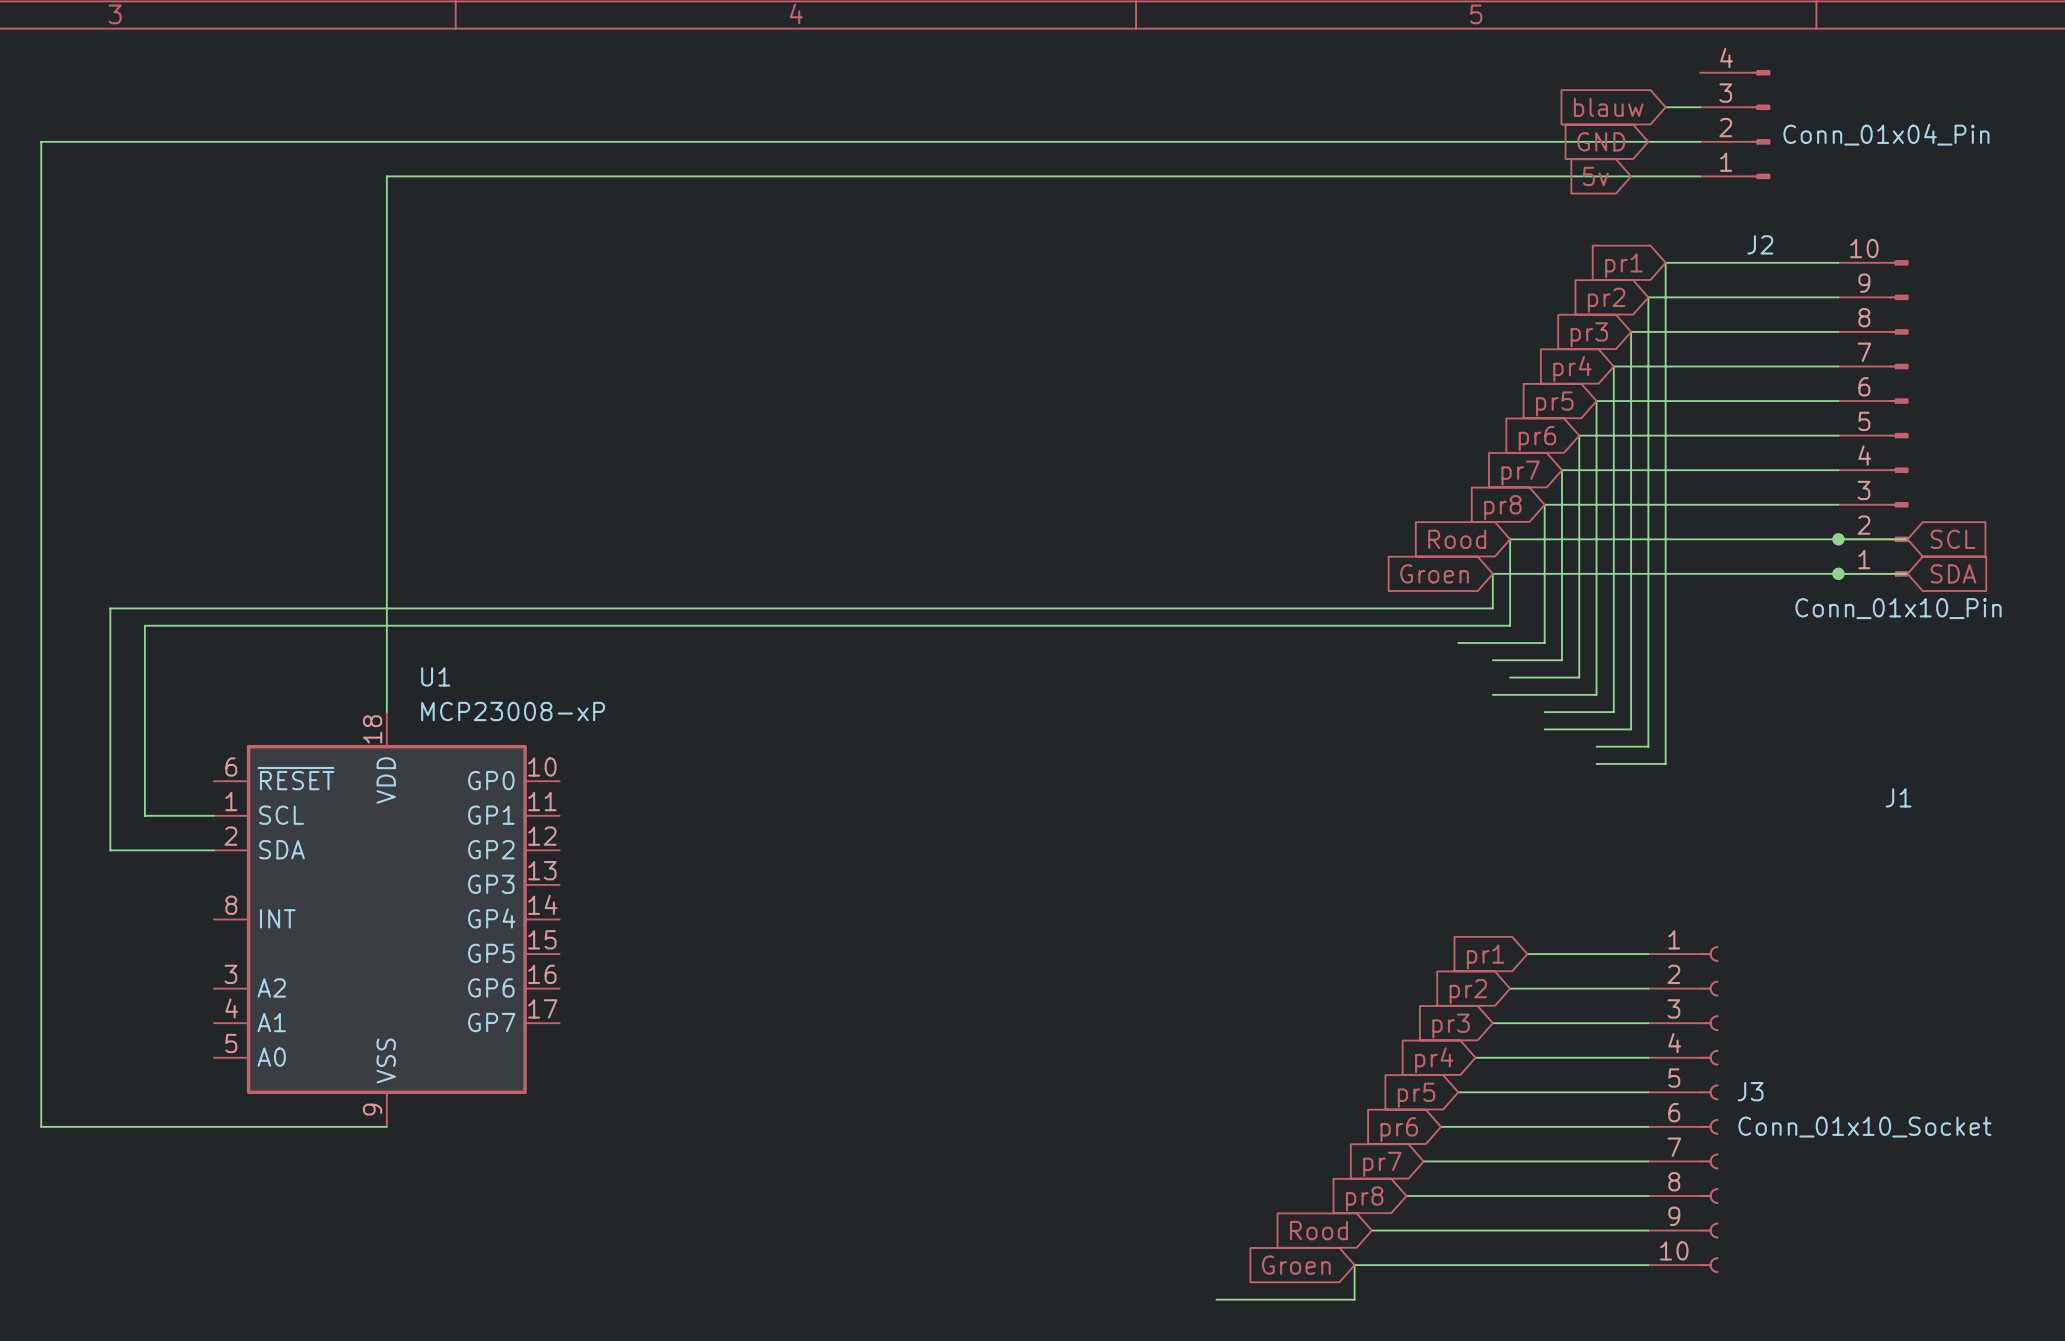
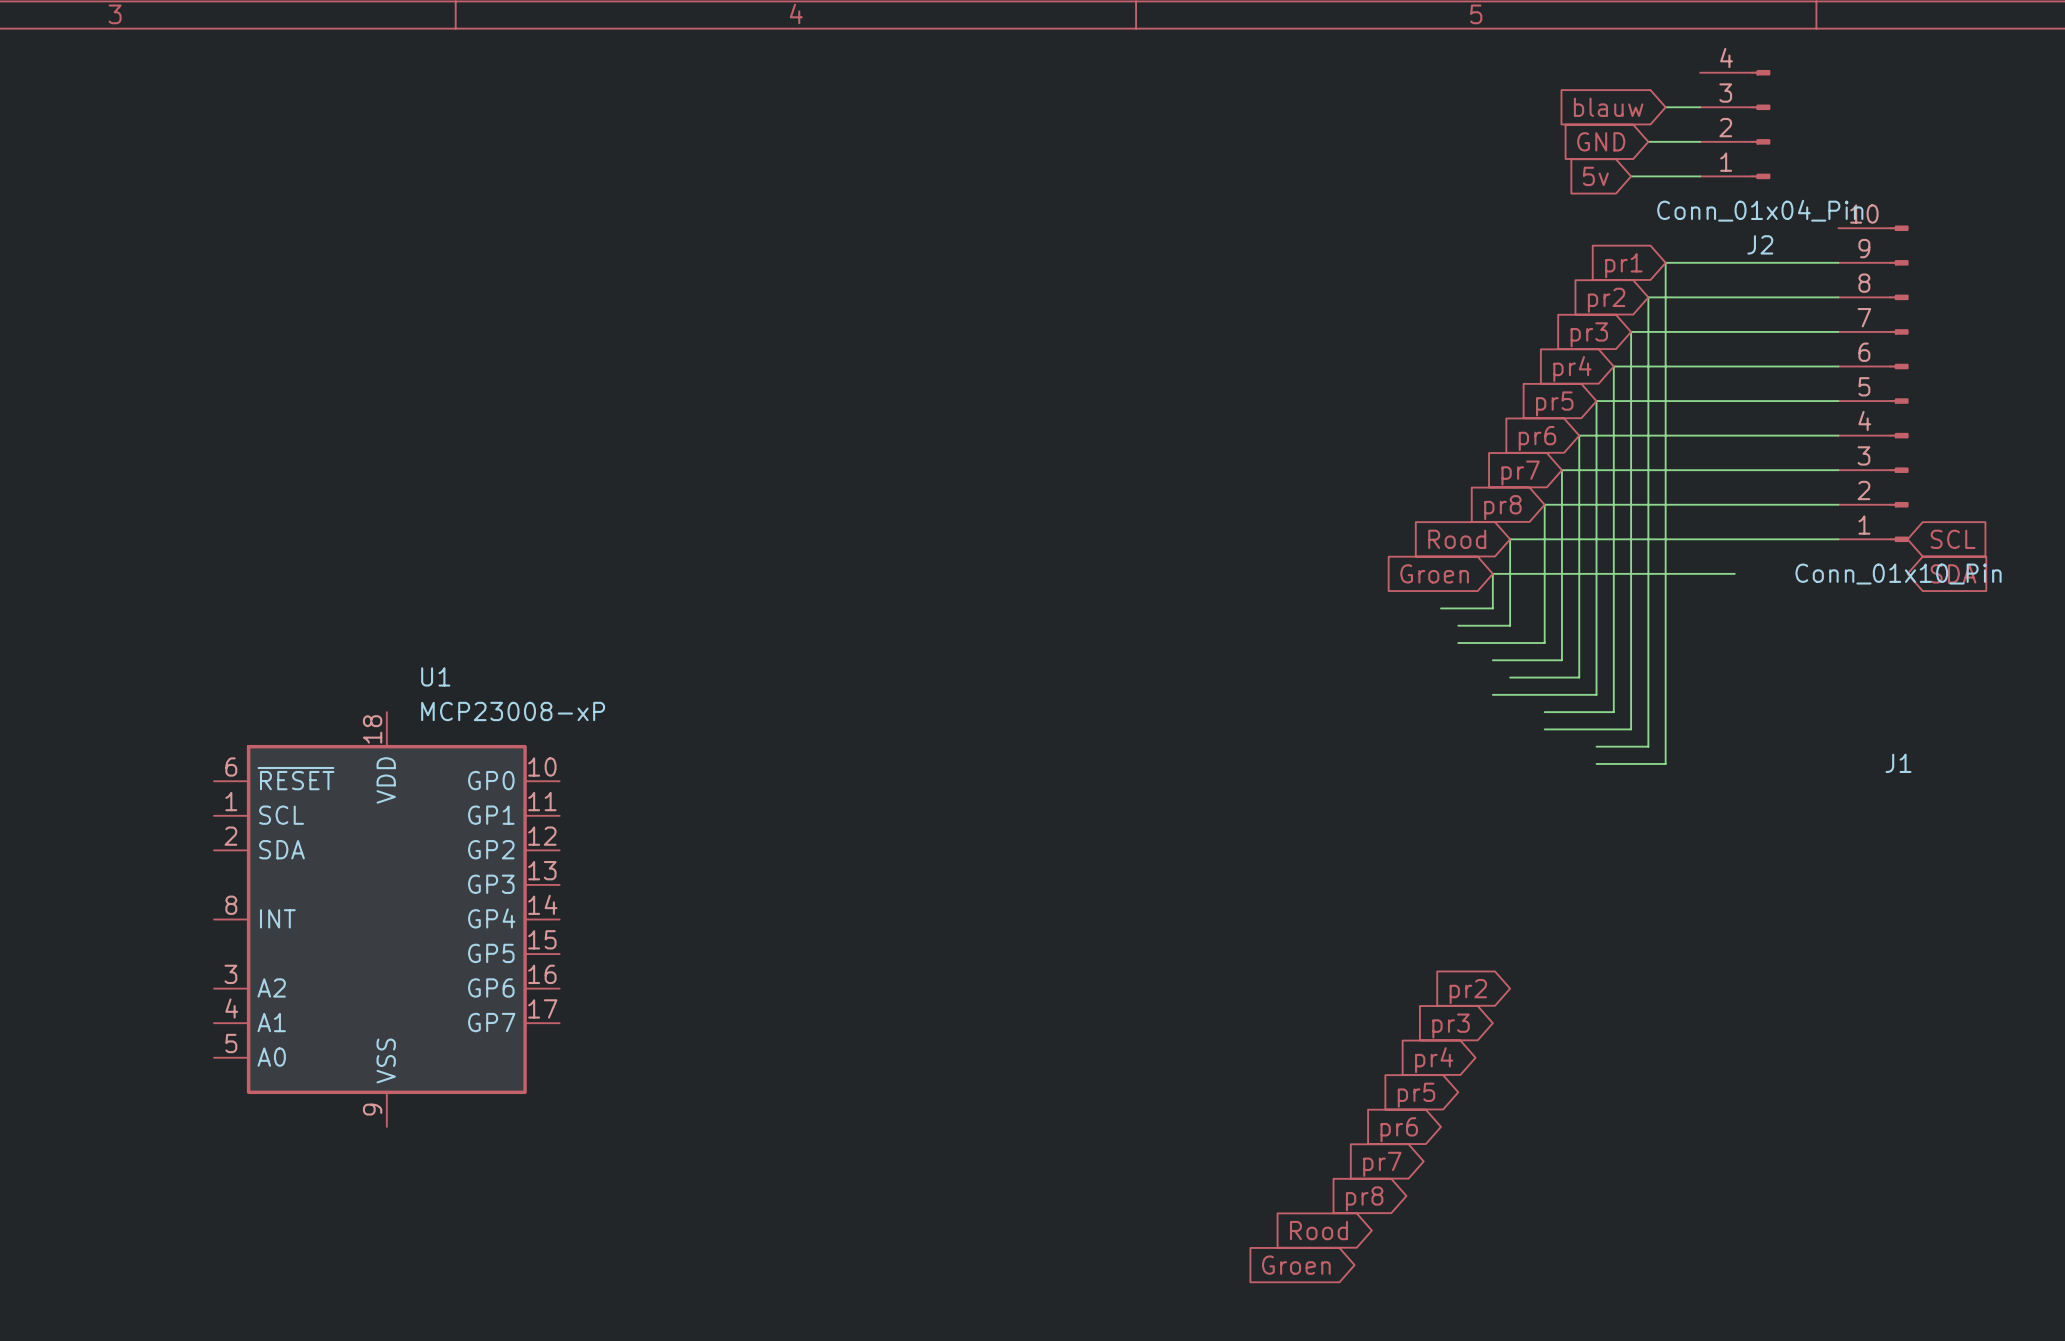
J2 value position: Conn_01x04_Pin (1886, 134) -> Conn_01x04_Pin (1760, 210)
wire: (1648, 141) (41, 141) (41, 1126) (386, 1126) -> none
wire: (1631, 176) (386, 176) (386, 712) -> none
J1 position: (1873, 418) -> (1873, 383)
junction: (1838, 539) -> none
wire: (1734, 573) (1907, 573) -> none
junction: (1838, 573) -> none
wire: (1441, 608) (110, 608) (110, 850) (214, 850) -> none
wire: (1458, 625) (144, 625) (144, 815) (214, 815) -> none
wire: (1527, 954) (1648, 954) -> none
global label: pr1 (1485, 956) -> none
wire: (1510, 988) (1648, 988) -> none
wire: (1492, 1023) (1648, 1023) -> none
wire: (1475, 1057) (1648, 1057) -> none
wire: (1458, 1092) (1648, 1092) -> none
J3: Conn_01x10_Socket (1683, 1109) -> none
wire: (1441, 1126) (1648, 1126) -> none
wire: (1423, 1161) (1648, 1161) -> none
wire: (1406, 1195) (1648, 1195) -> none
wire: (1371, 1230) (1648, 1230) -> none
wire: (1648, 1265) (1354, 1265) (1354, 1299) (1216, 1299) -> none

